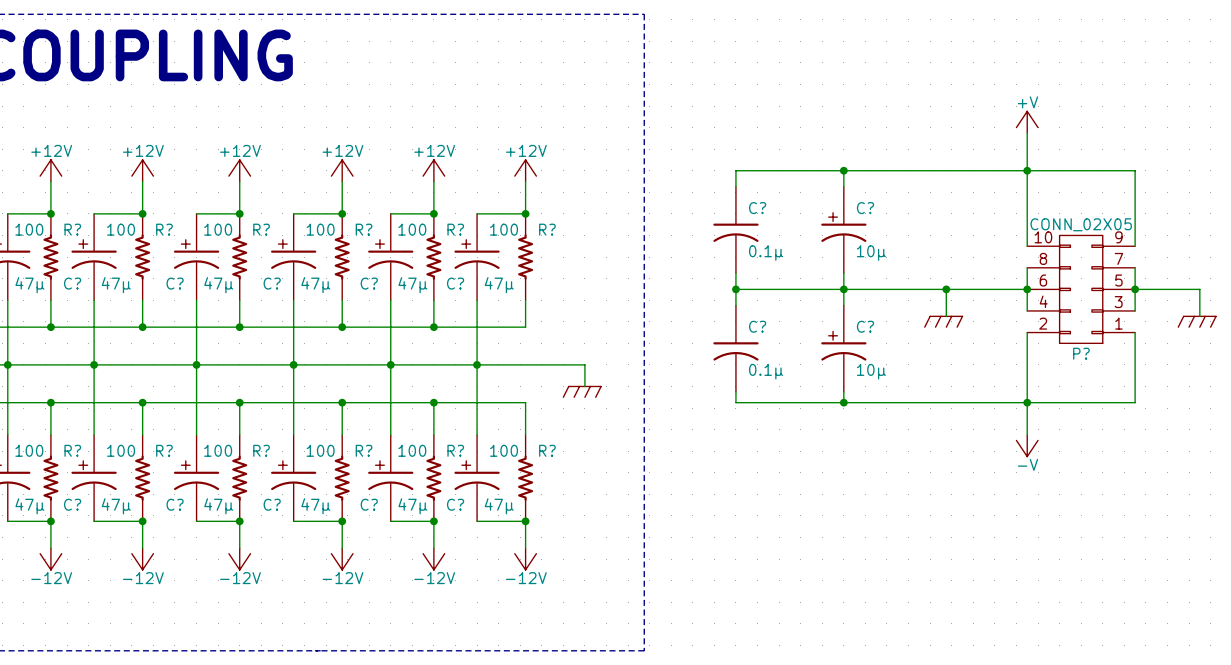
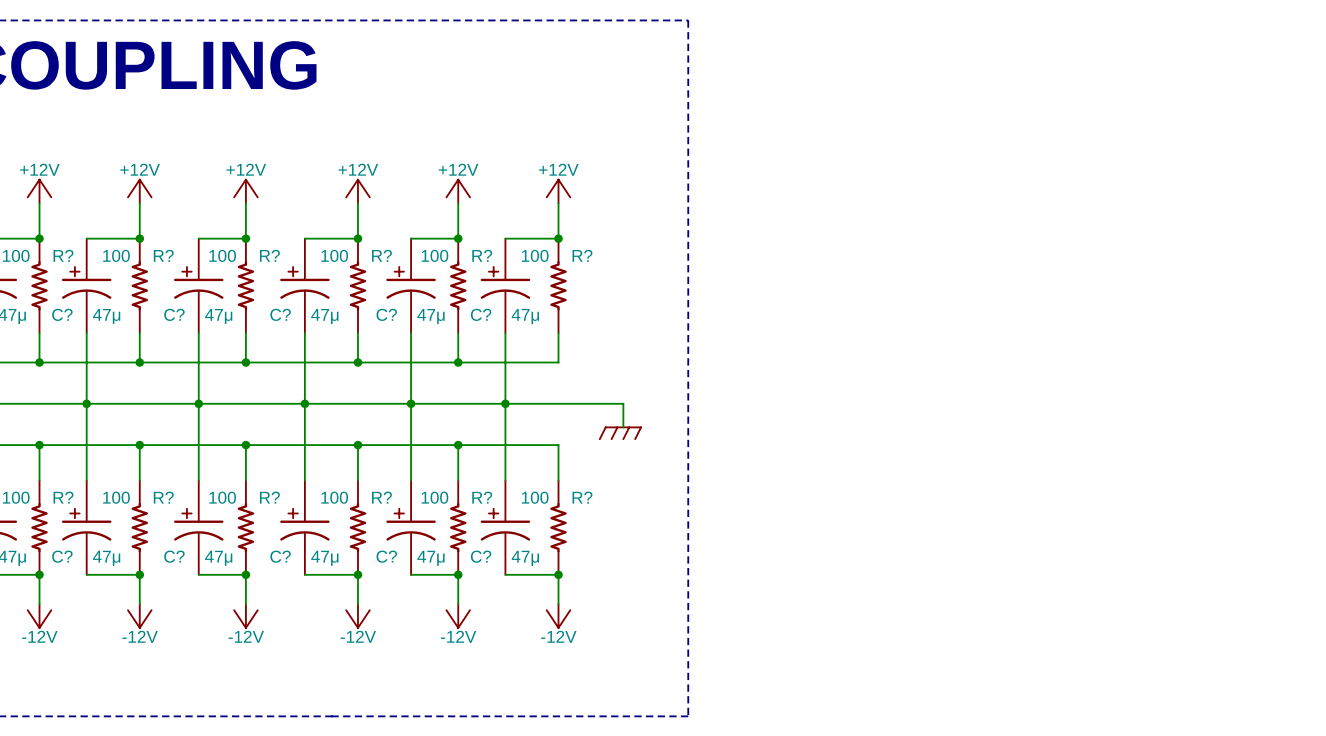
power symbol: +V (1027, 122) -> none
wire: (1027, 132) (1027, 246) -> none
wire: (843, 170) (843, 186) -> none
junction: (843, 170) -> none
junction: (1027, 170) -> none
wire: (735, 186) (735, 170) (1135, 170) (1135, 246) -> none
C?: 0.1μ (735, 230) -> none
C?: 10µ (843, 230) -> none
wire: (1027, 267) (1027, 310) -> none
wire: (1135, 267) (1135, 310) -> none
wire: (735, 273) (735, 305) -> none
wire: (843, 273) (843, 305) -> none
wire: (735, 289) (1027, 289) -> none
junction: (735, 289) -> none
junction: (843, 289) -> none
wire: (946, 289) (946, 316) -> none
junction: (946, 289) -> none
junction: (1027, 289) -> none
P?: CONN_02X05 (1081, 289) -> none
wire: (1135, 289) (1199, 289) (1199, 316) -> none
junction: (1135, 289) -> none
power symbol: (943, 321) -> none
power symbol: (1197, 321) -> none
wire: (1027, 332) (1027, 435) -> none
wire: (1135, 332) (1135, 402) (735, 402) (735, 391) -> none
C?: 0.1μ (735, 348) -> none
C?: 10µ (843, 348) -> none
wire: (843, 391) (843, 402) -> none
junction: (843, 402) -> none
junction: (1027, 402) -> none
power symbol: -V (1027, 445) -> none

